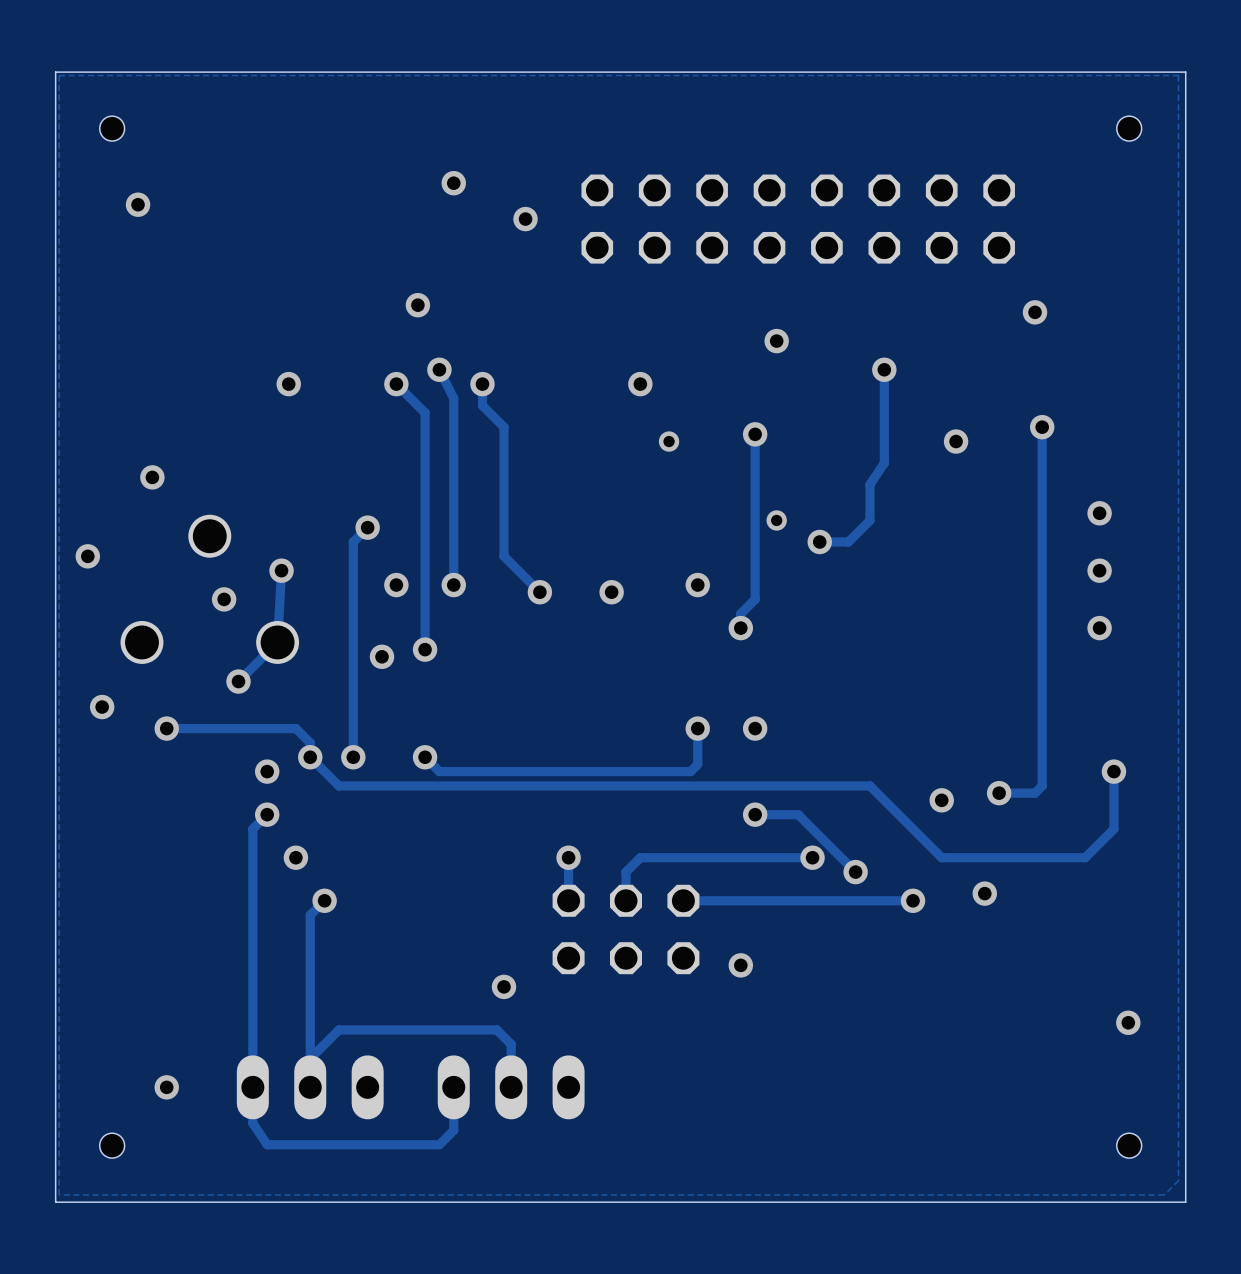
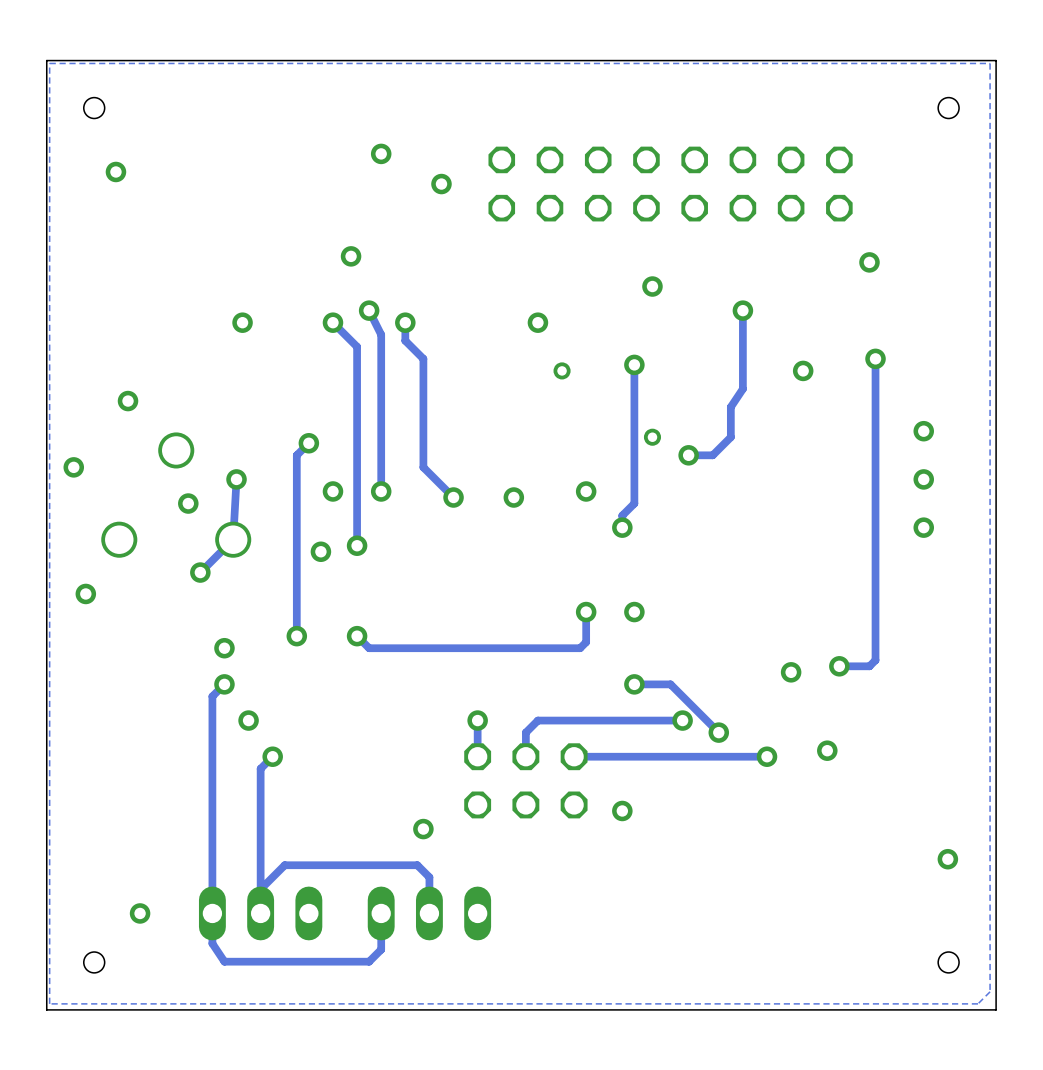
track: (166, 728) (295, 728) (310, 742) (310, 757) (338, 785) (869, 785) (941, 857) (1085, 857) (1113, 829) (1113, 771) -> none
via: (166, 728) -> none
via: (310, 757) -> none
via: (1113, 771) -> none

